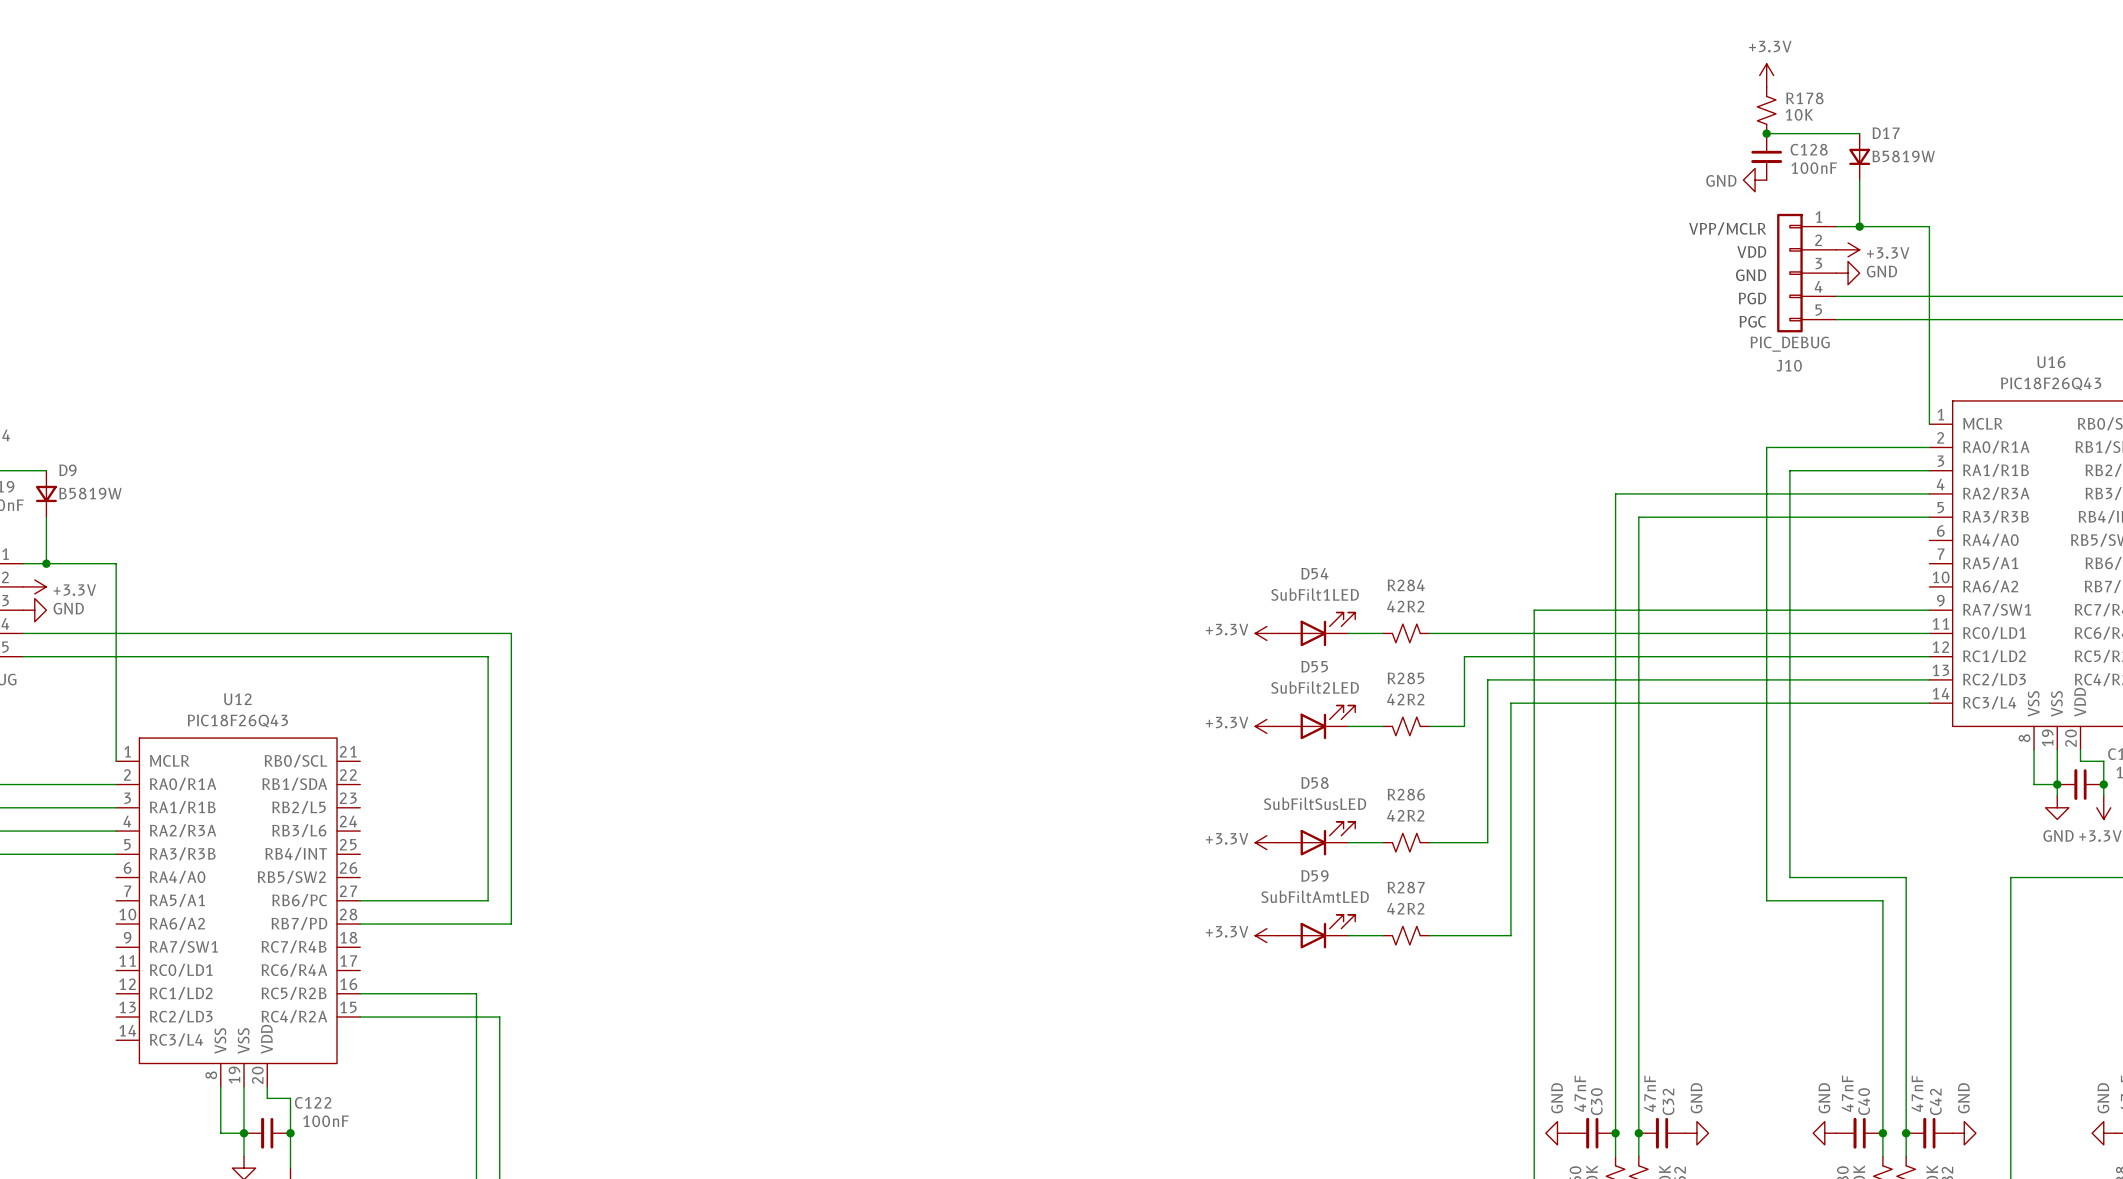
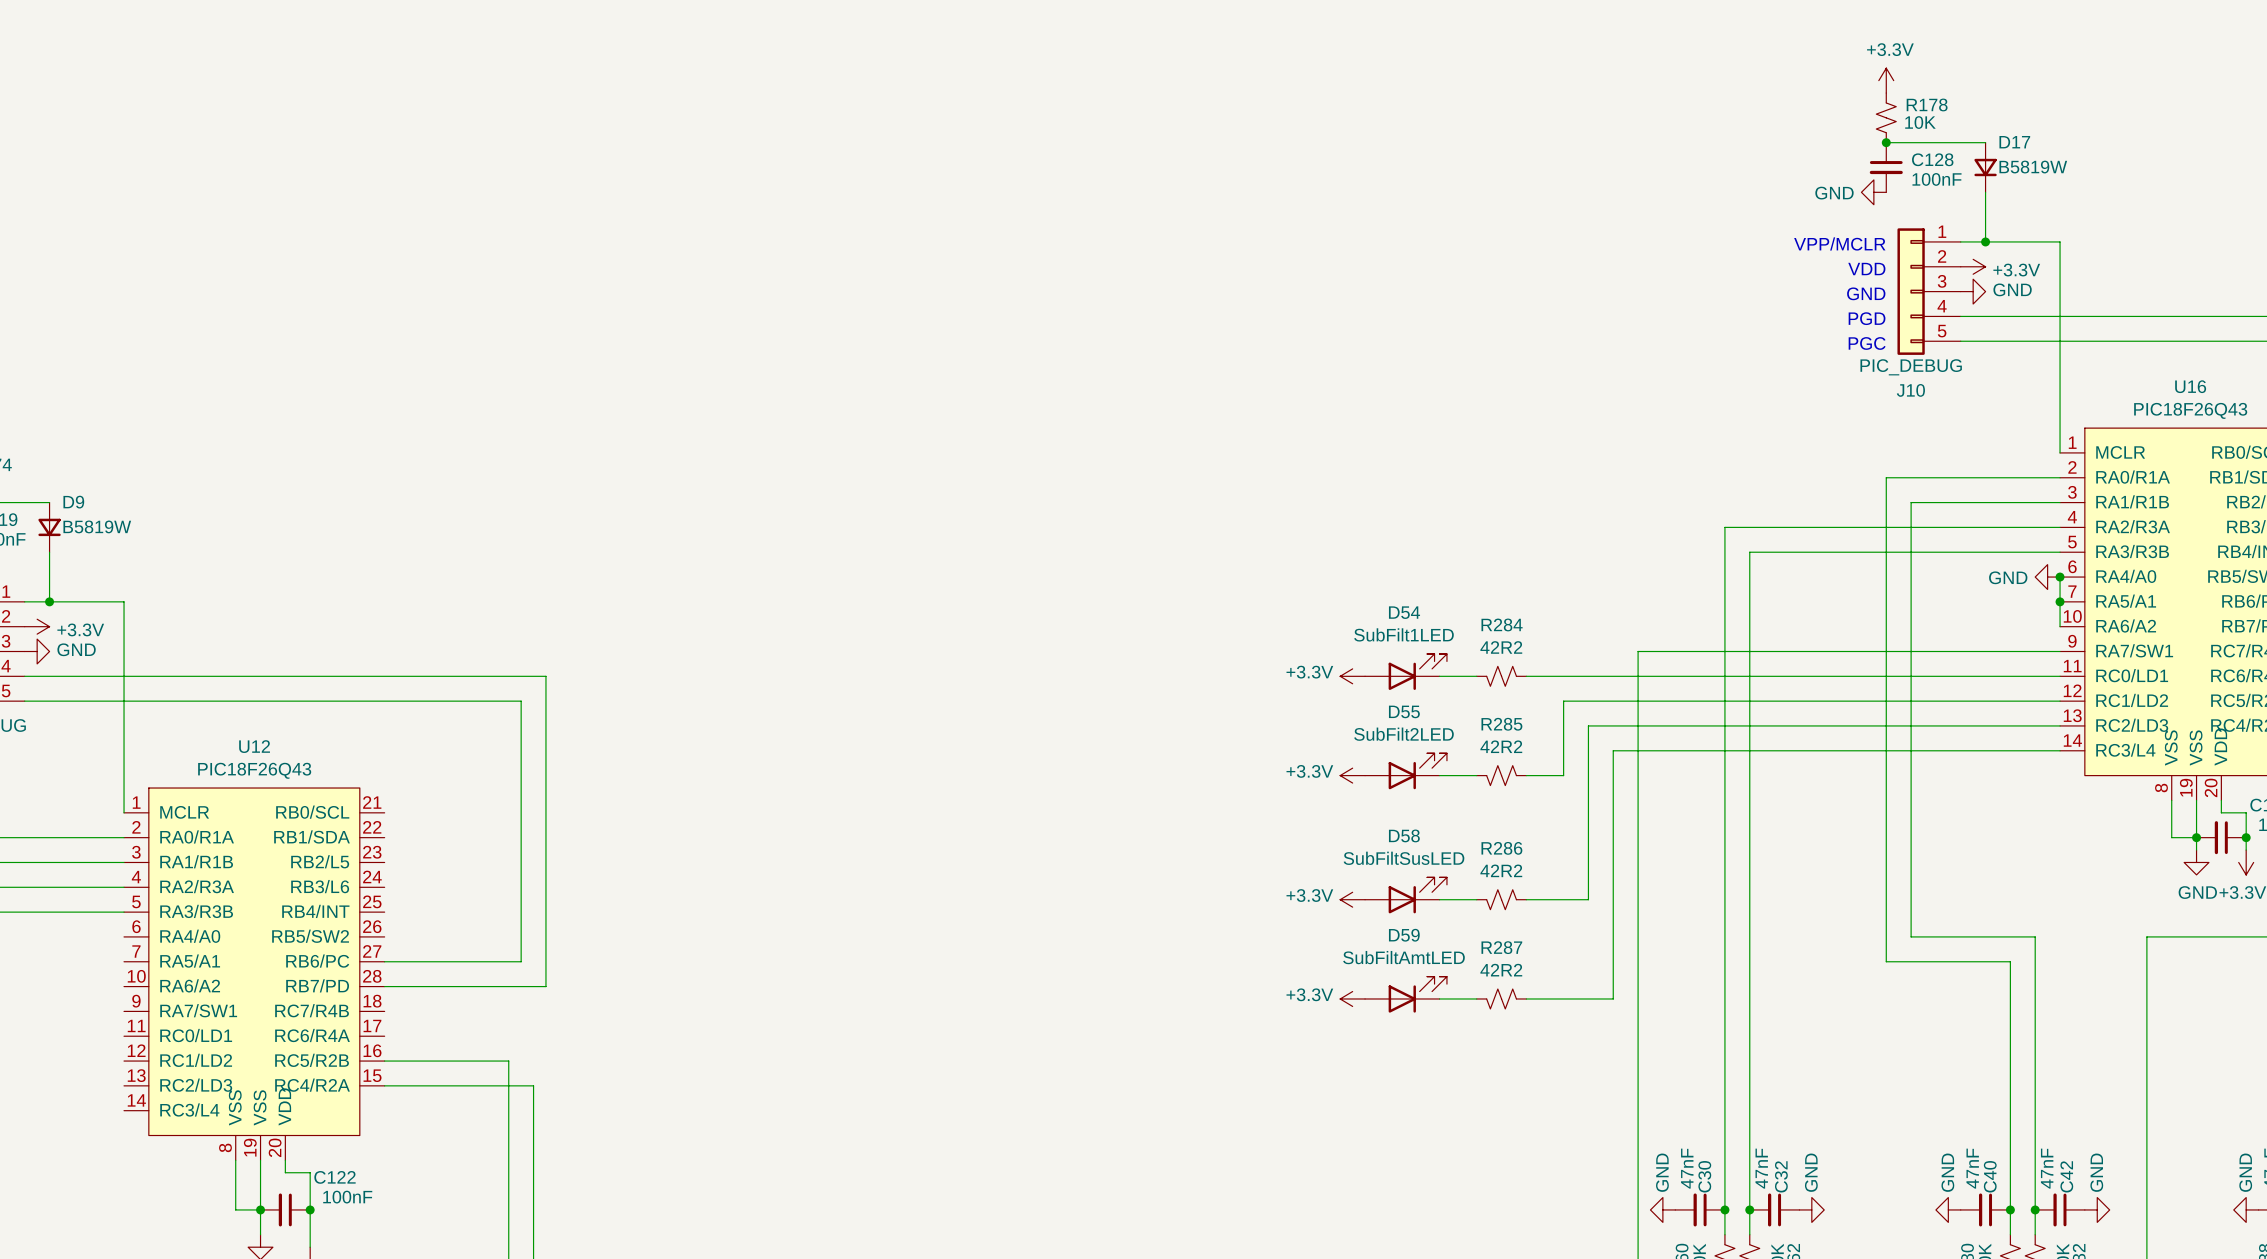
power symbol: none -> GND (2047, 577)
wire: none -> (2060, 577) (2060, 626)
junction: none -> (2060, 577)
junction: none -> (2060, 601)

